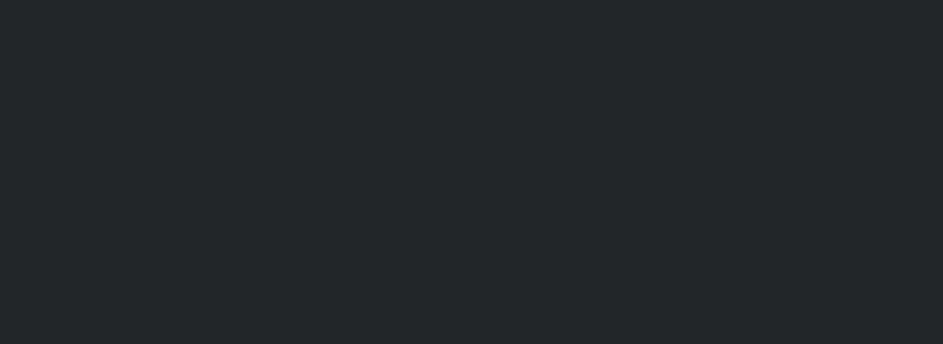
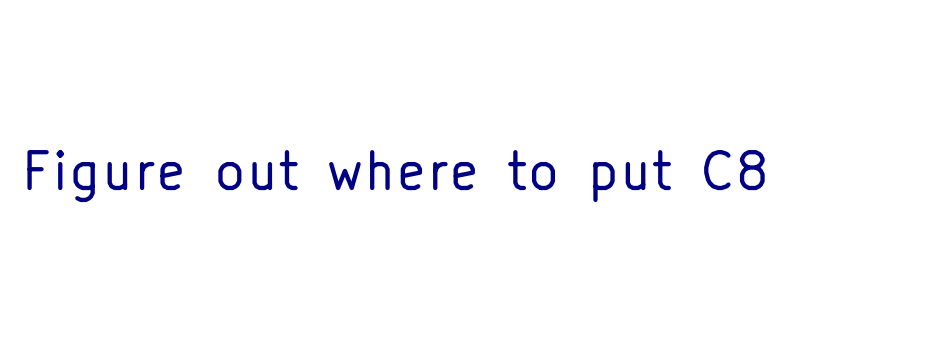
text: none -> Figure out where to put C8 (396, 176)

